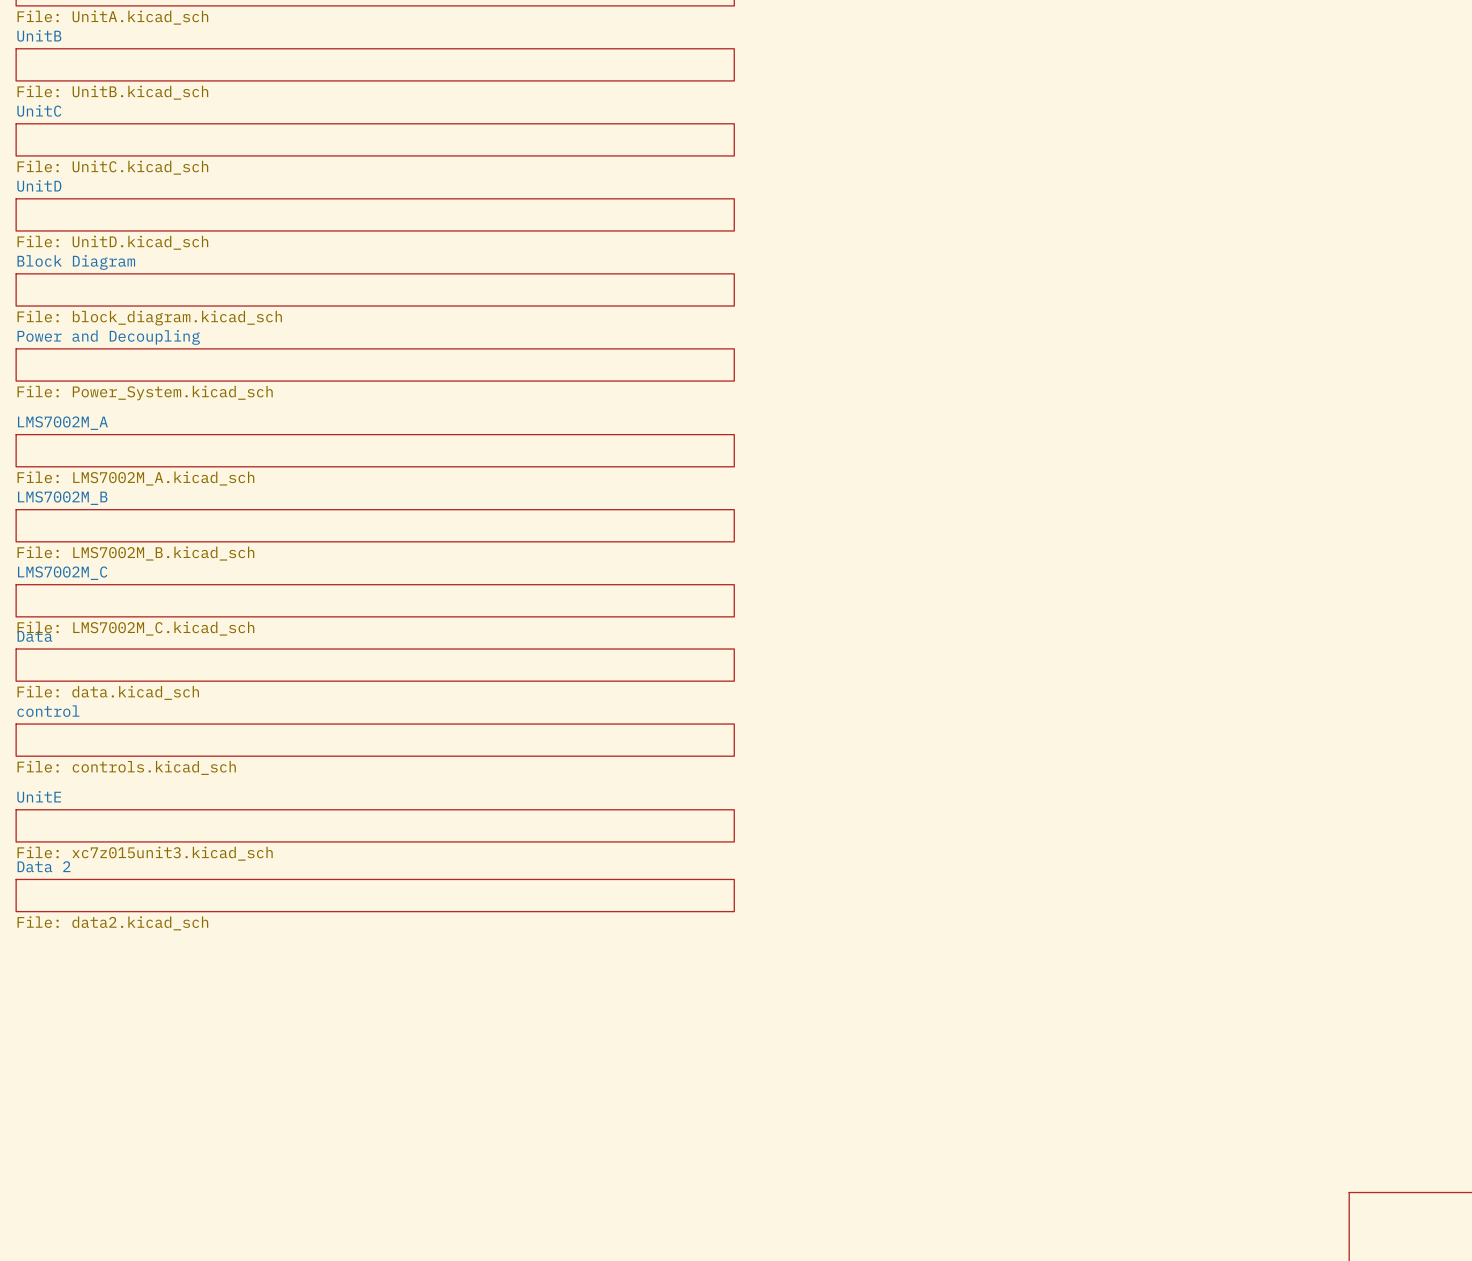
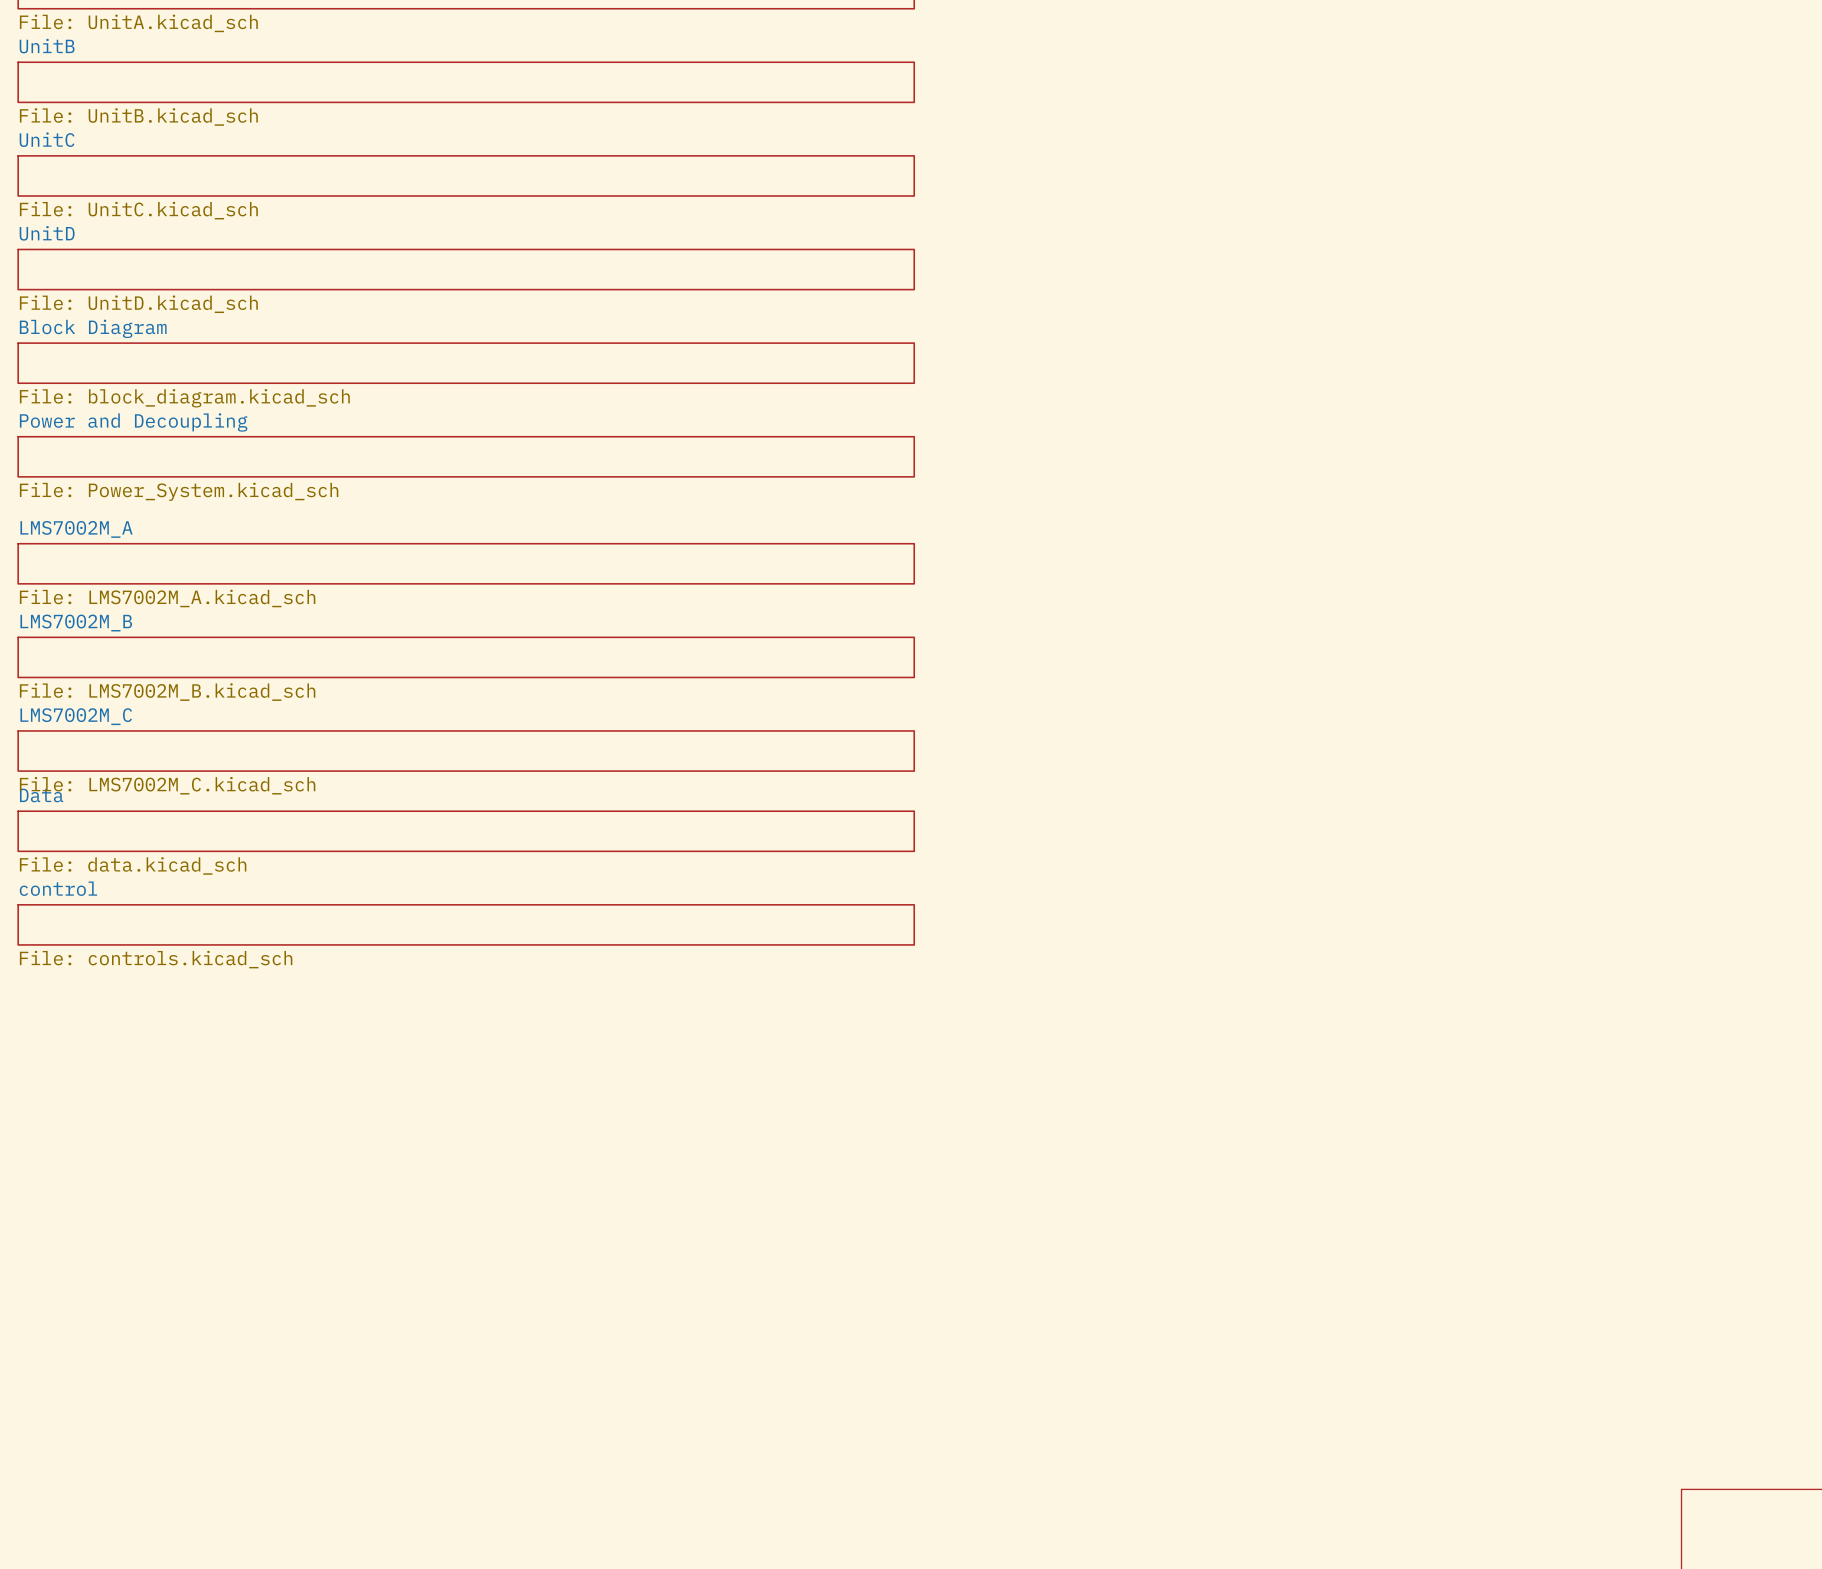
sheet UnitE: File: xc7z015unit3.kicad_sch (375, 825) -> none
sheet Data 2: File: data2.kicad_sch (375, 895) -> none

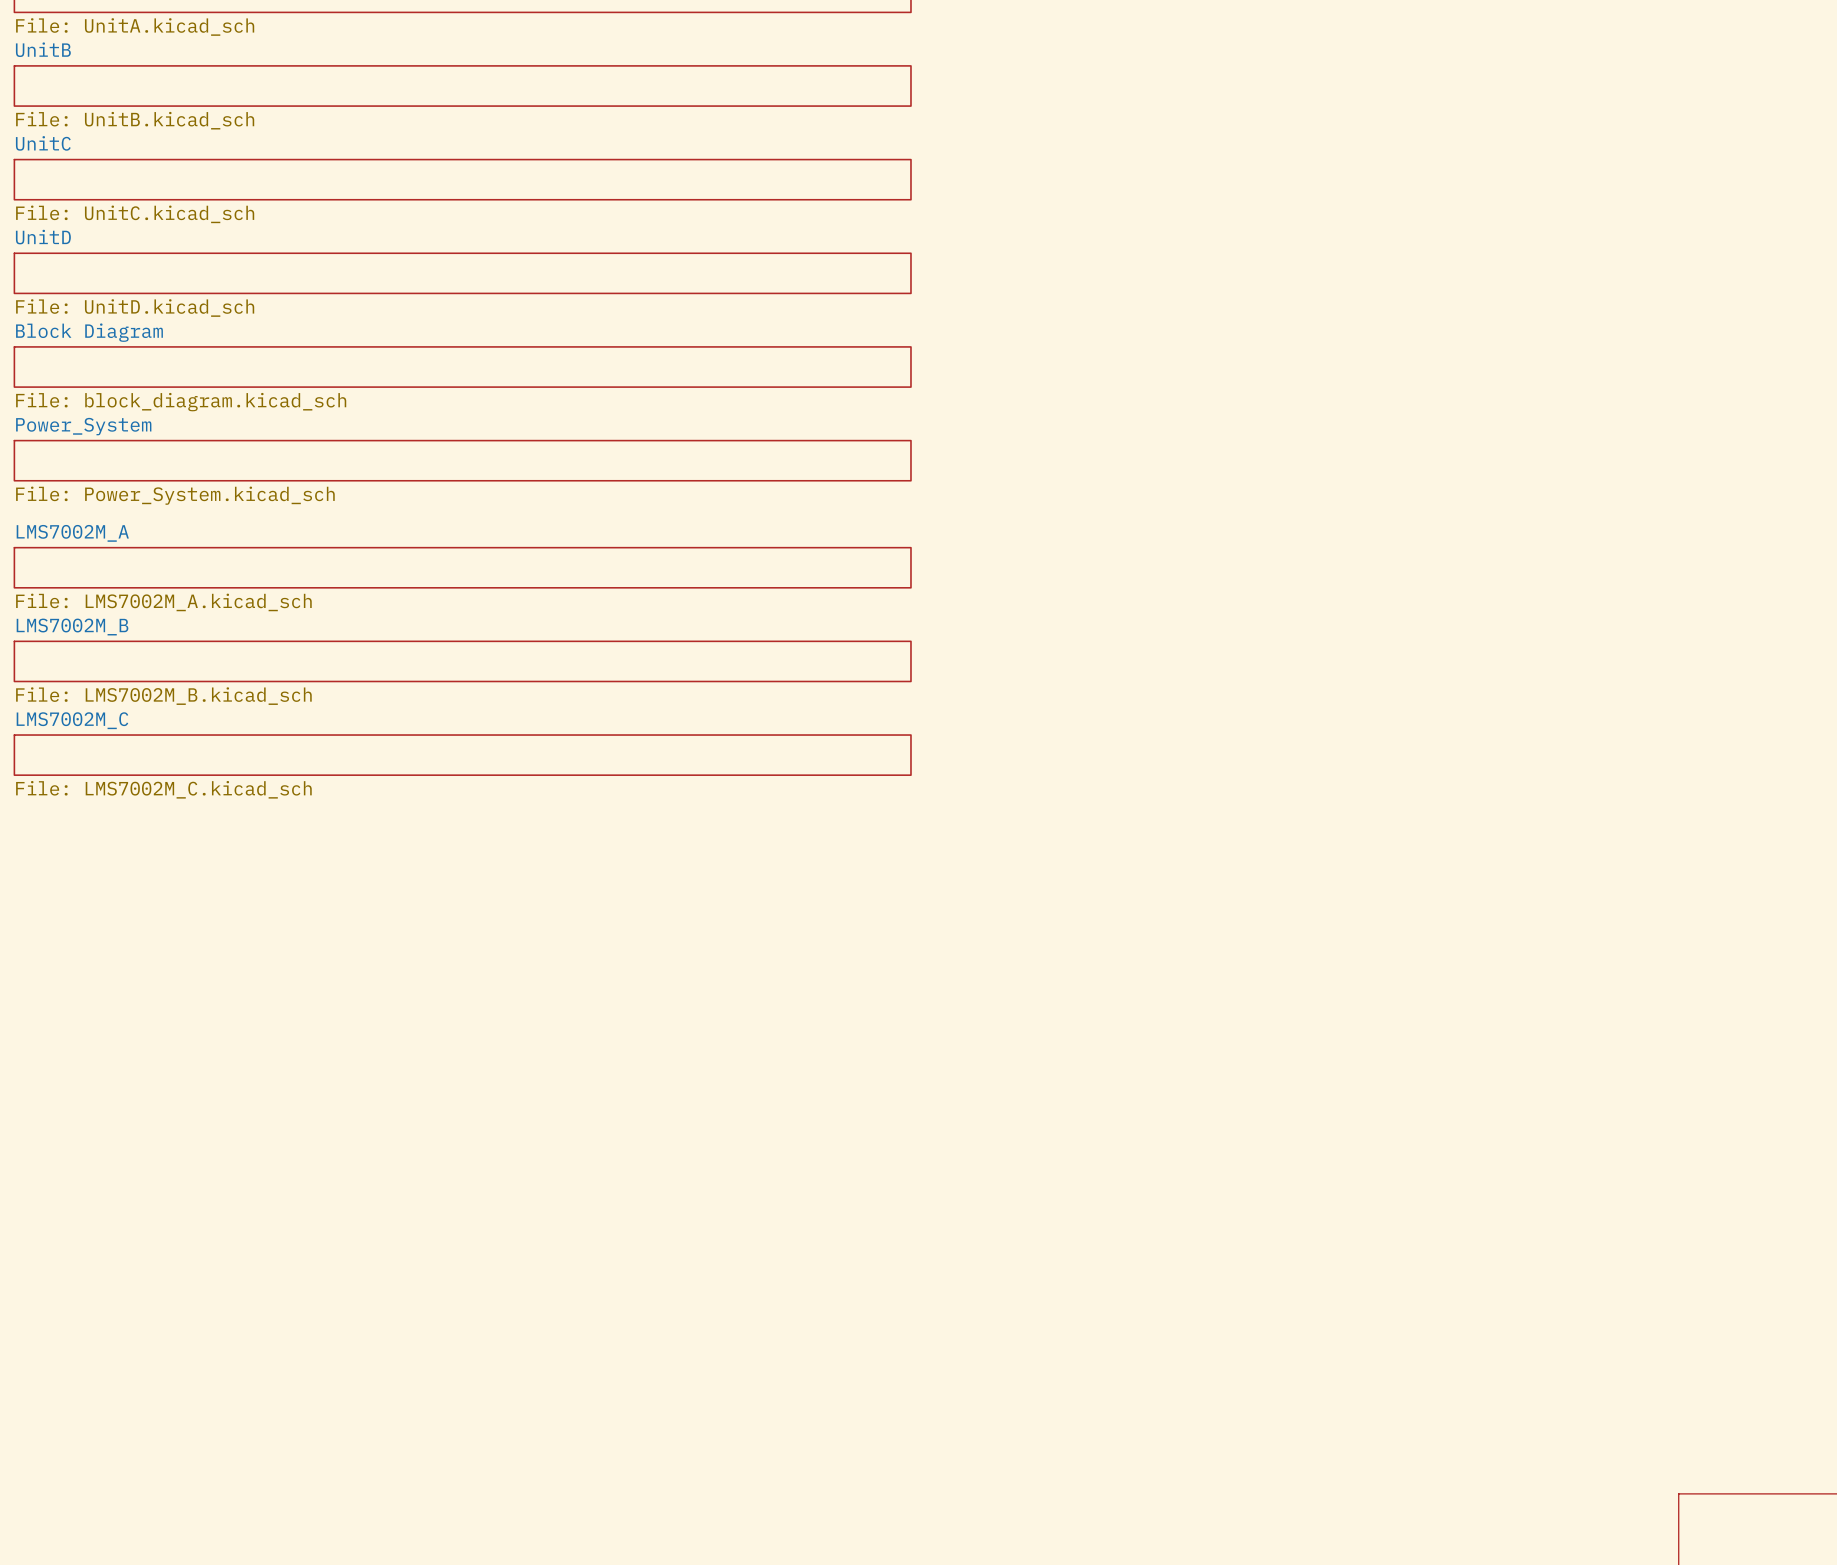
sheet Power and Decoupling name: Power and Decoupling (133, 422) -> Power_System (83, 426)
sheet Data: File: data.kicad_sch (466, 831) -> none
sheet control: File: controls.kicad_sch (466, 924) -> none

